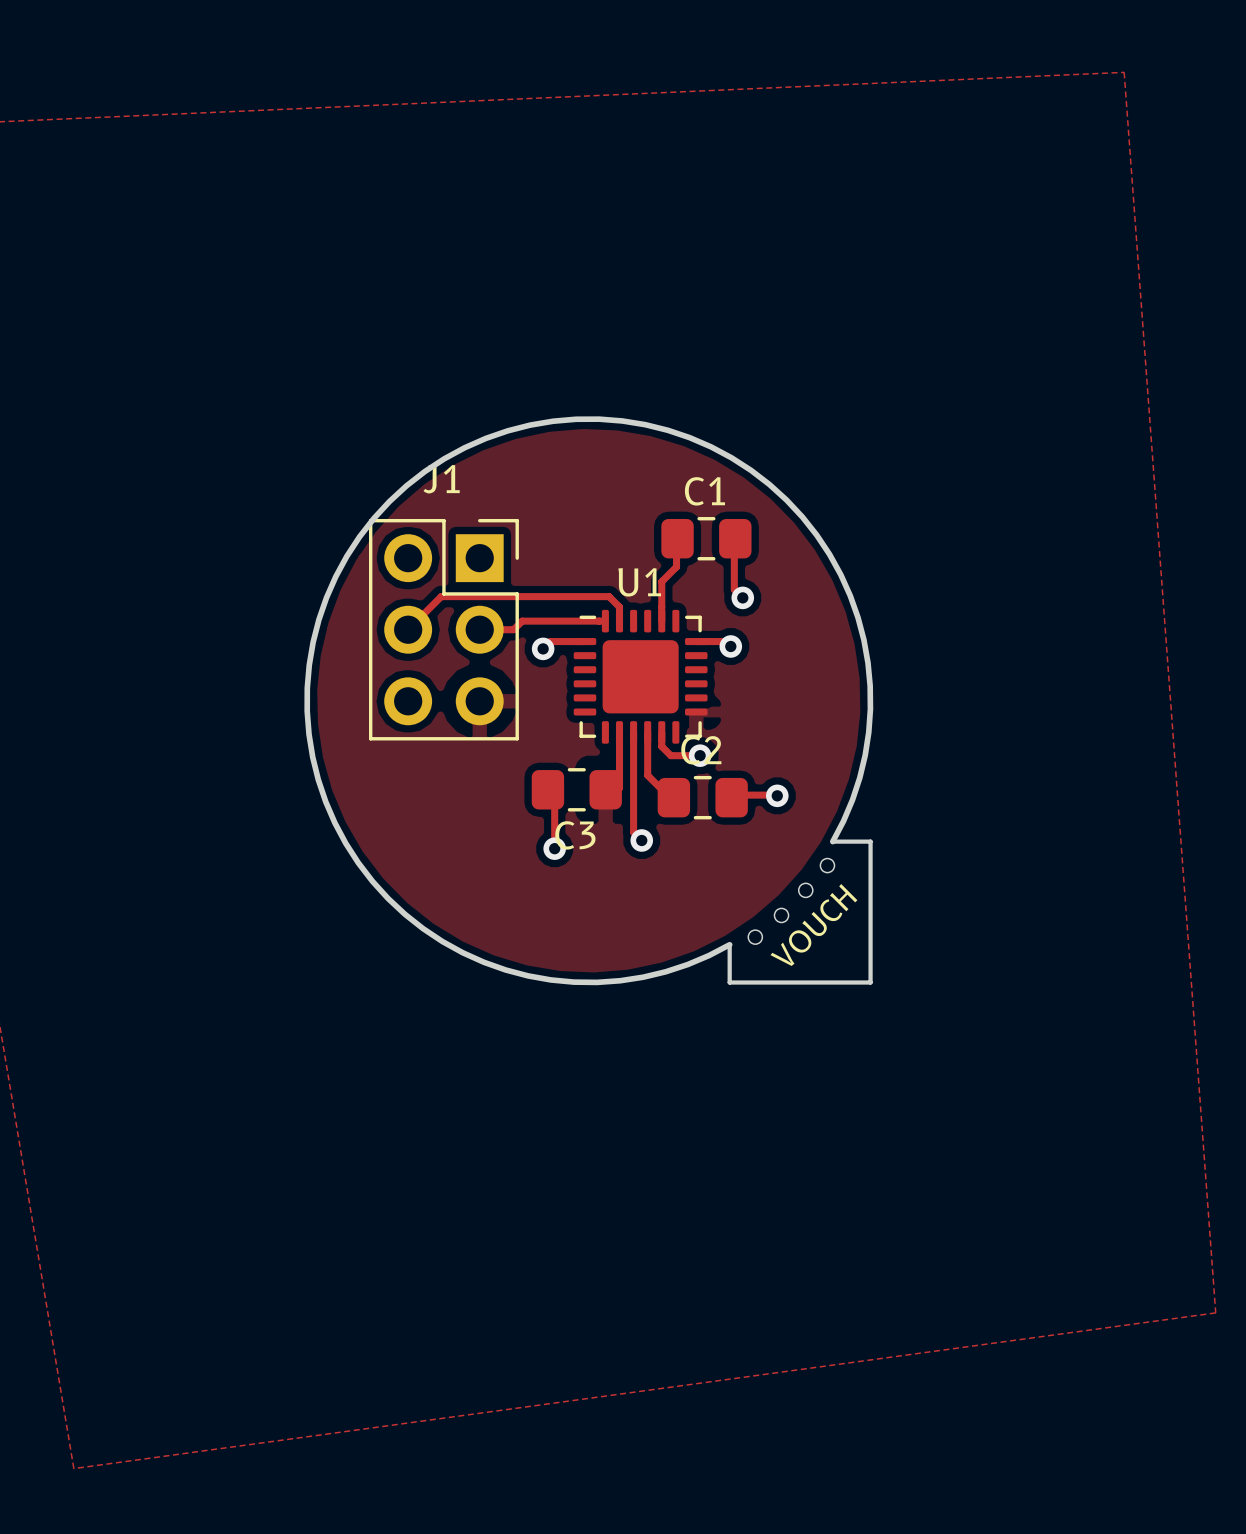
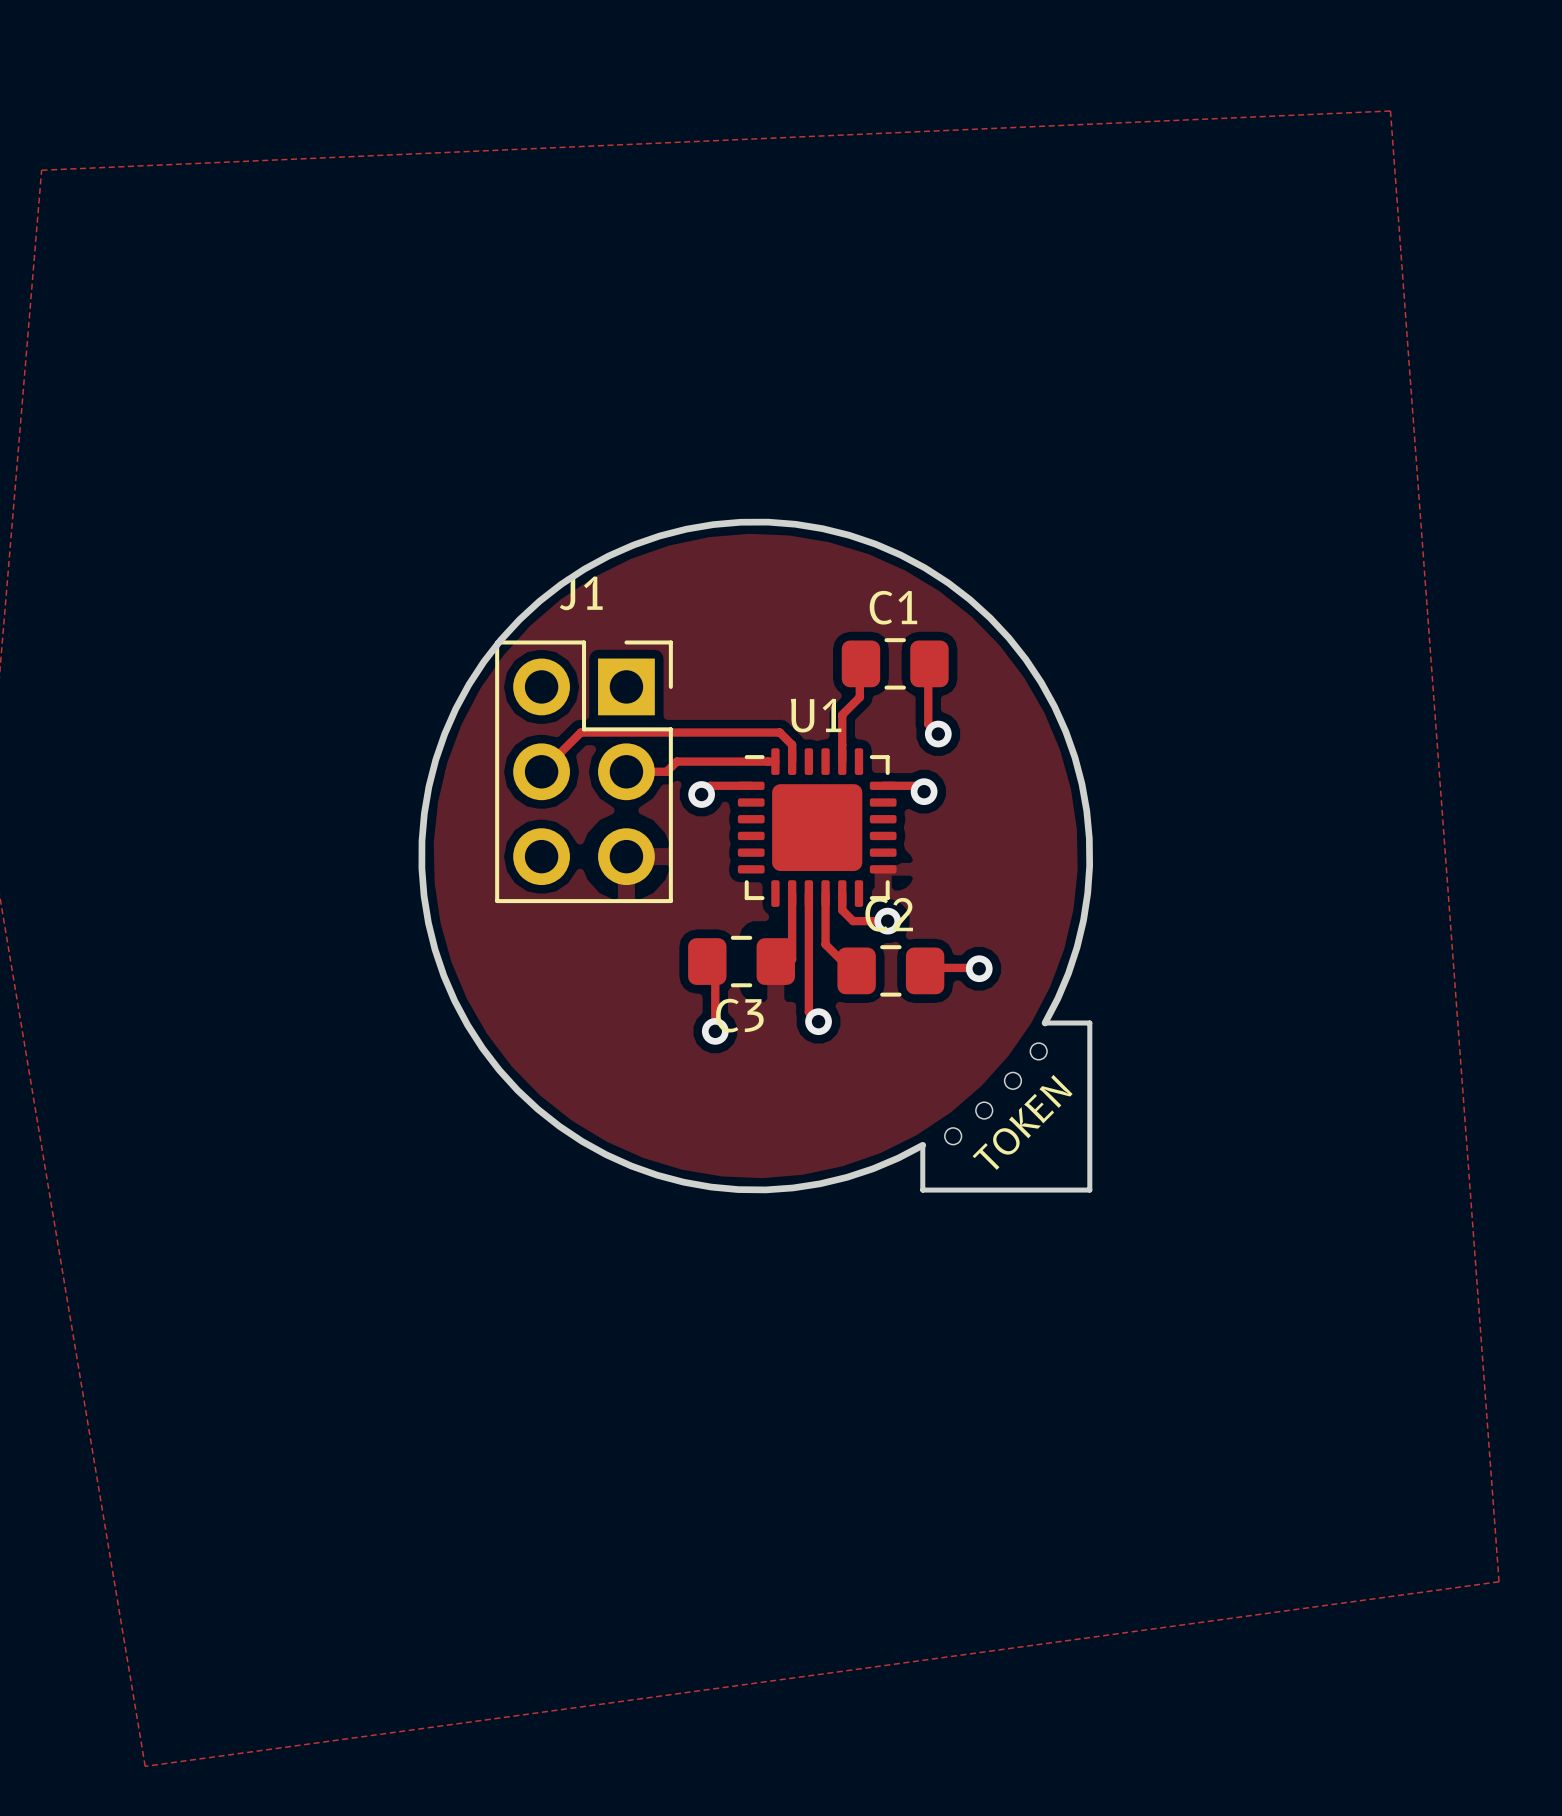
text: VOUCH (813, 924) -> TOKEN (1022, 1122)

